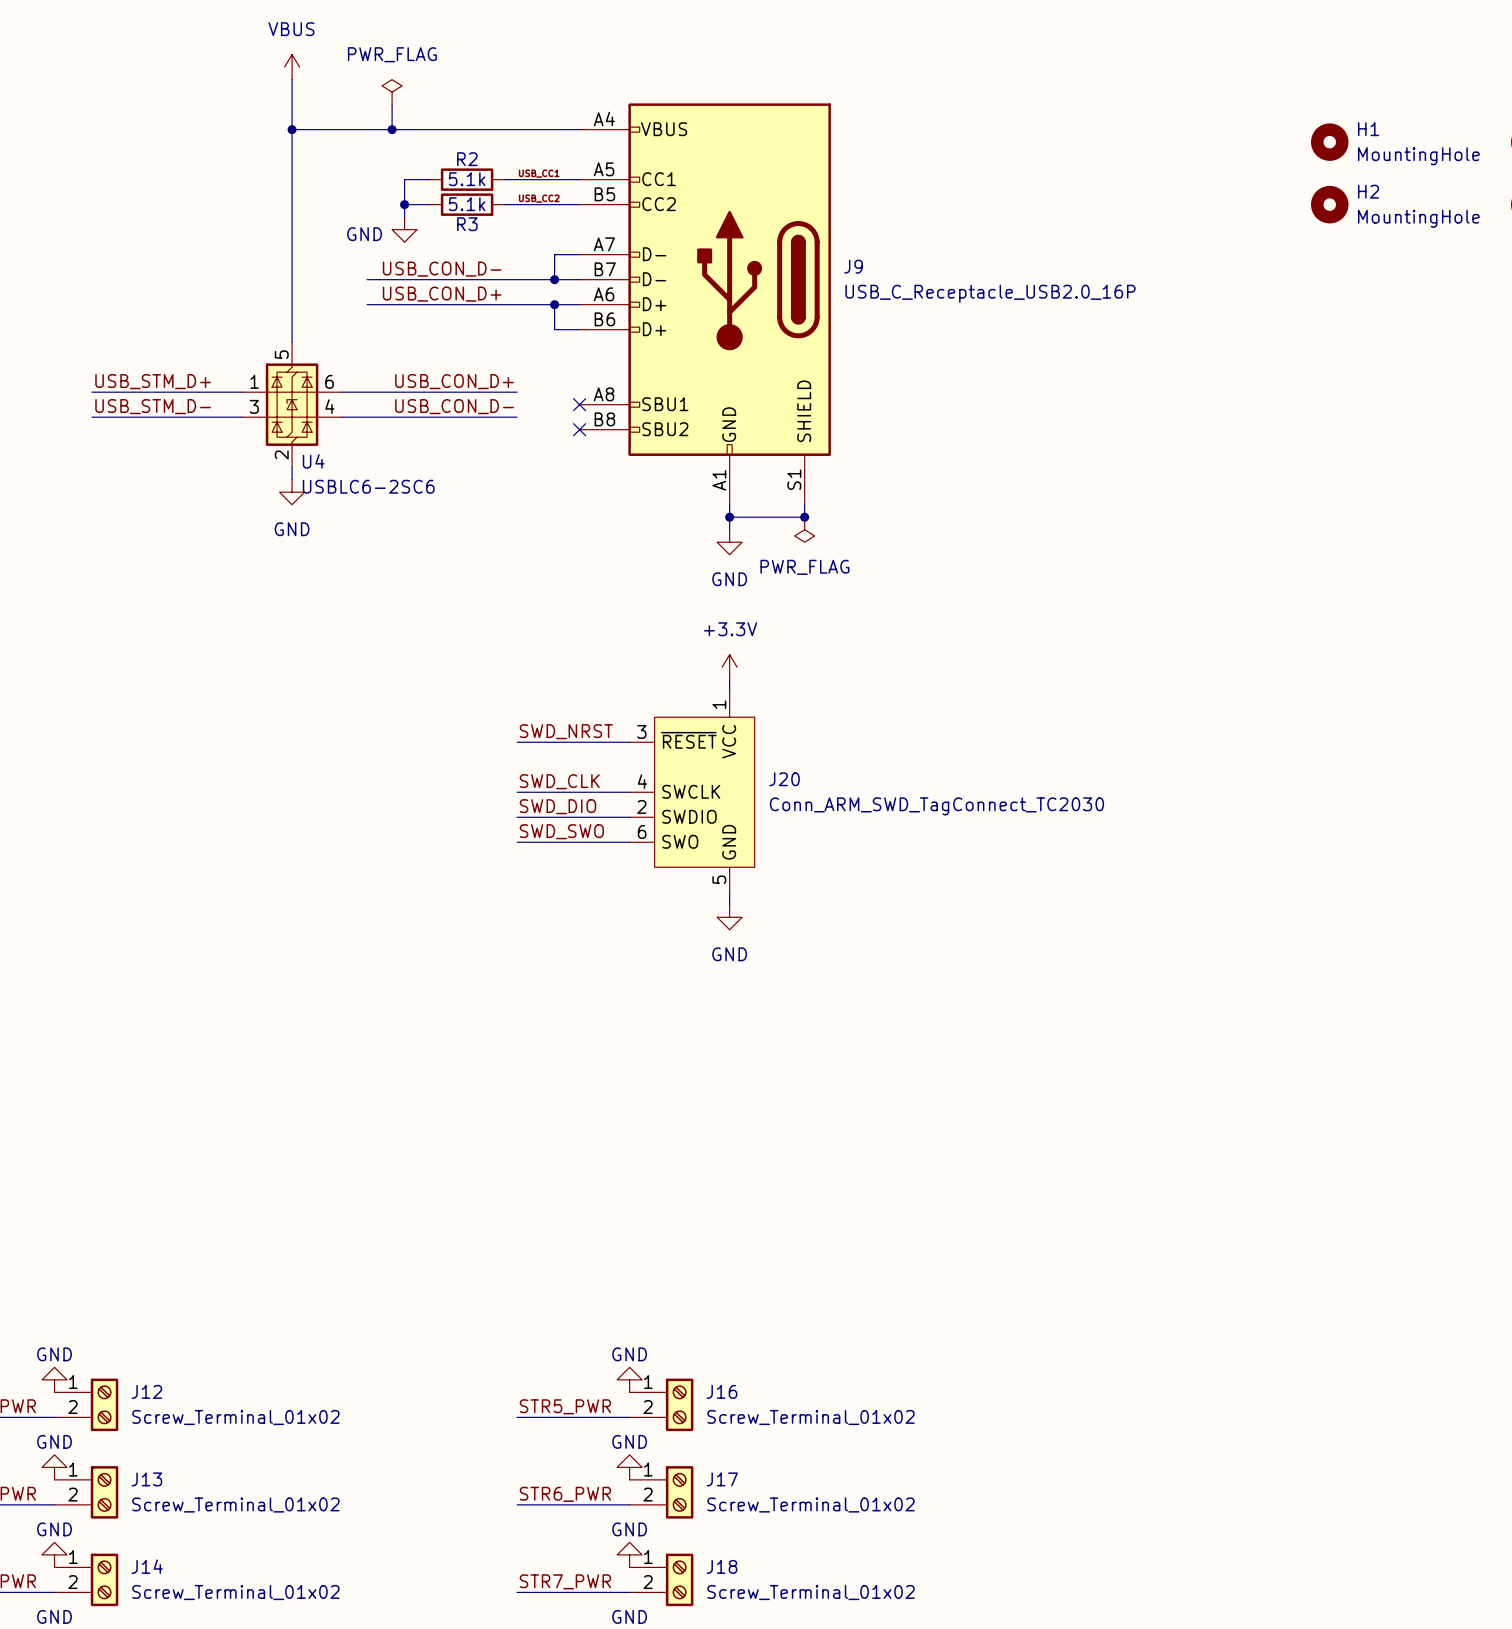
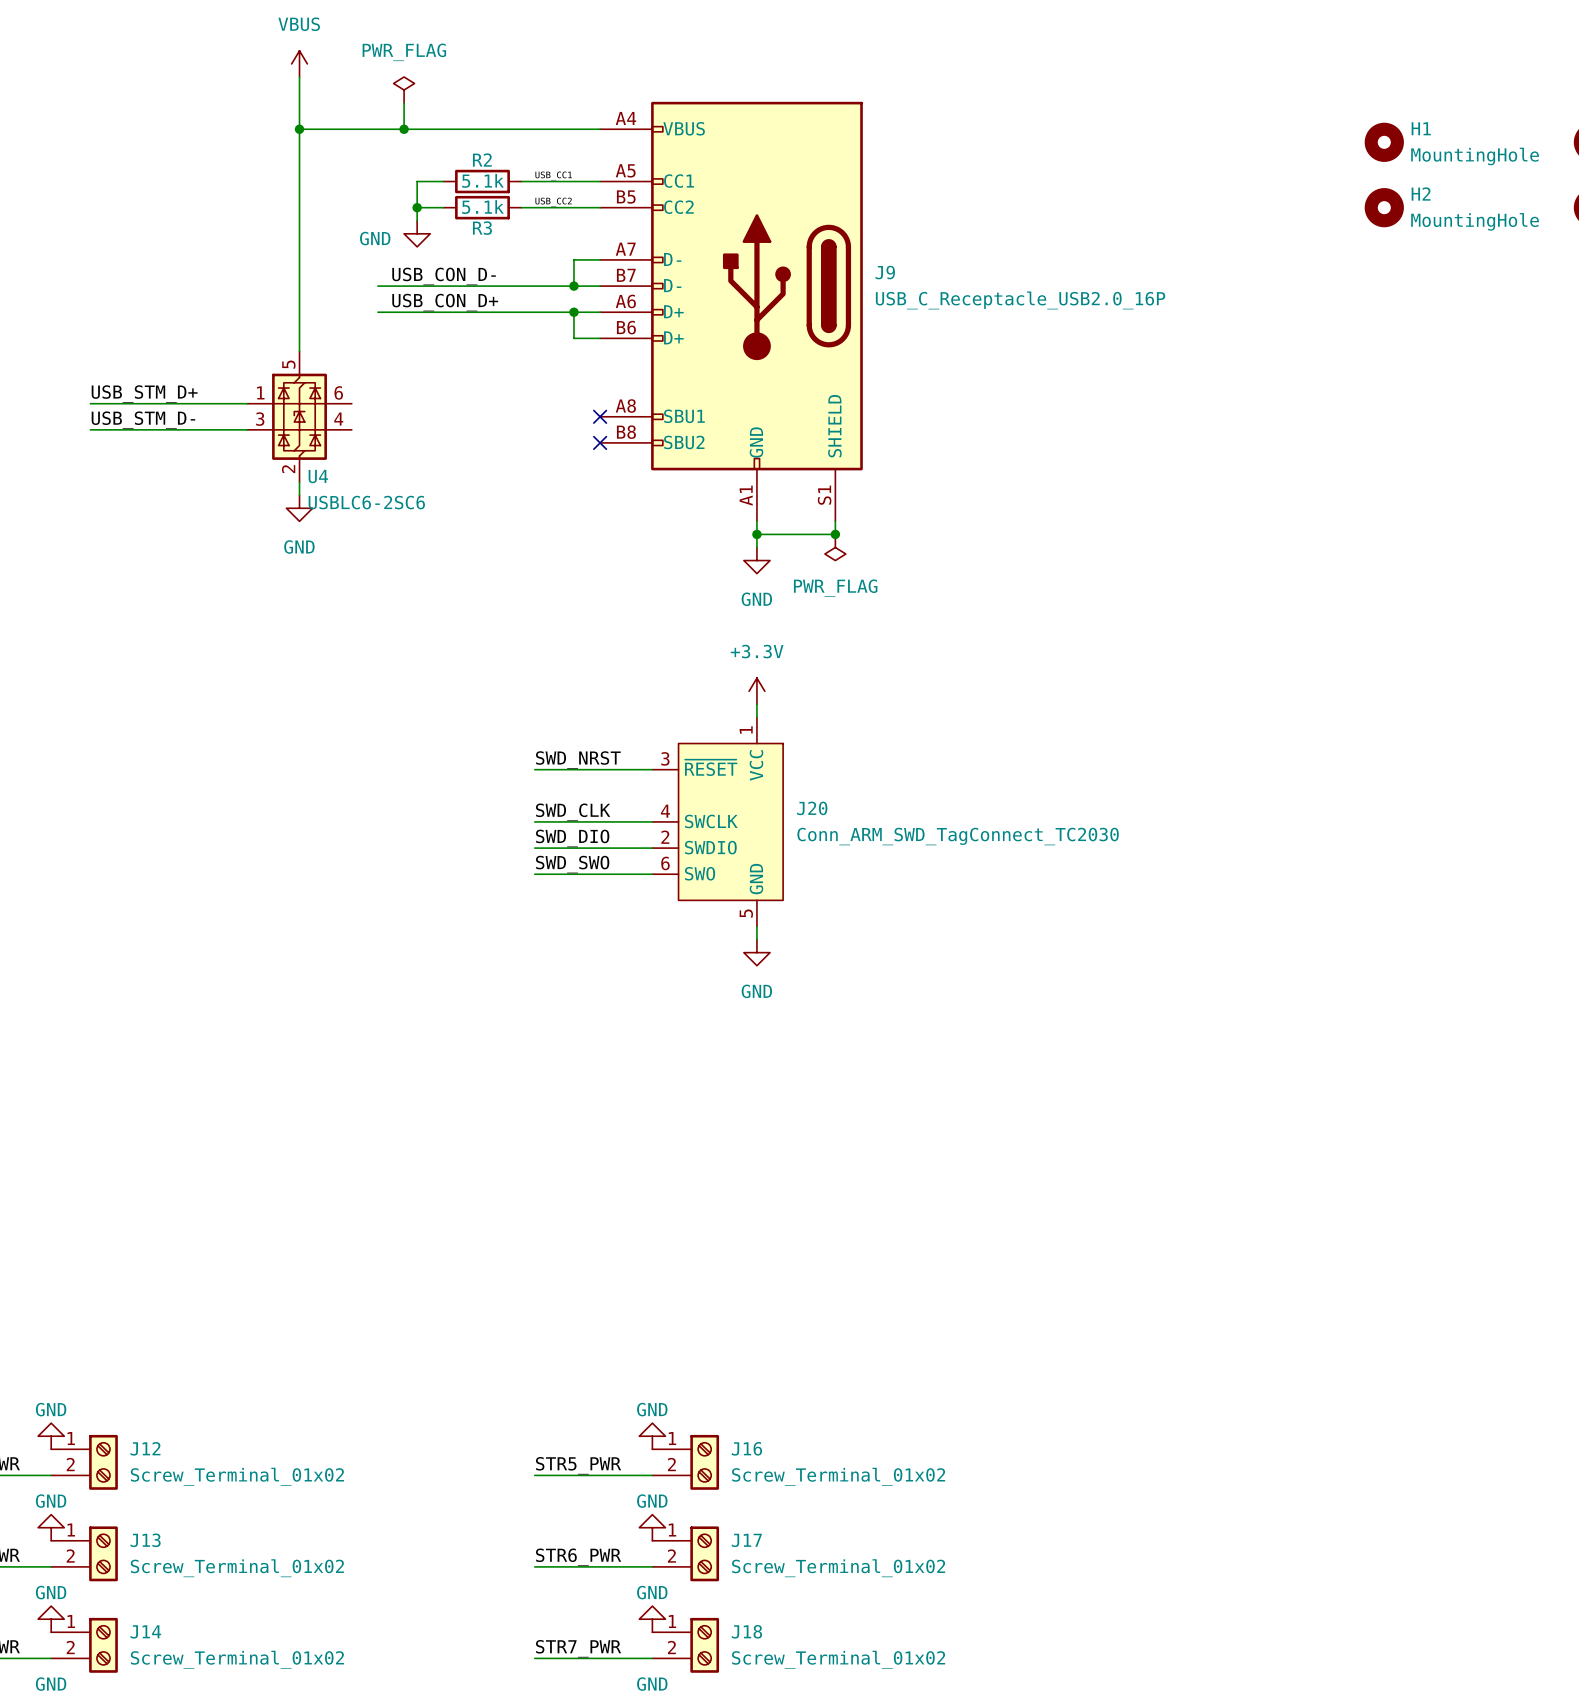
label: USB_CON_D+ (454, 381) -> none
wire: (342, 392) (517, 392) -> none
label: USB_CON_D- (454, 406) -> none
wire: (342, 417) (517, 417) -> none

